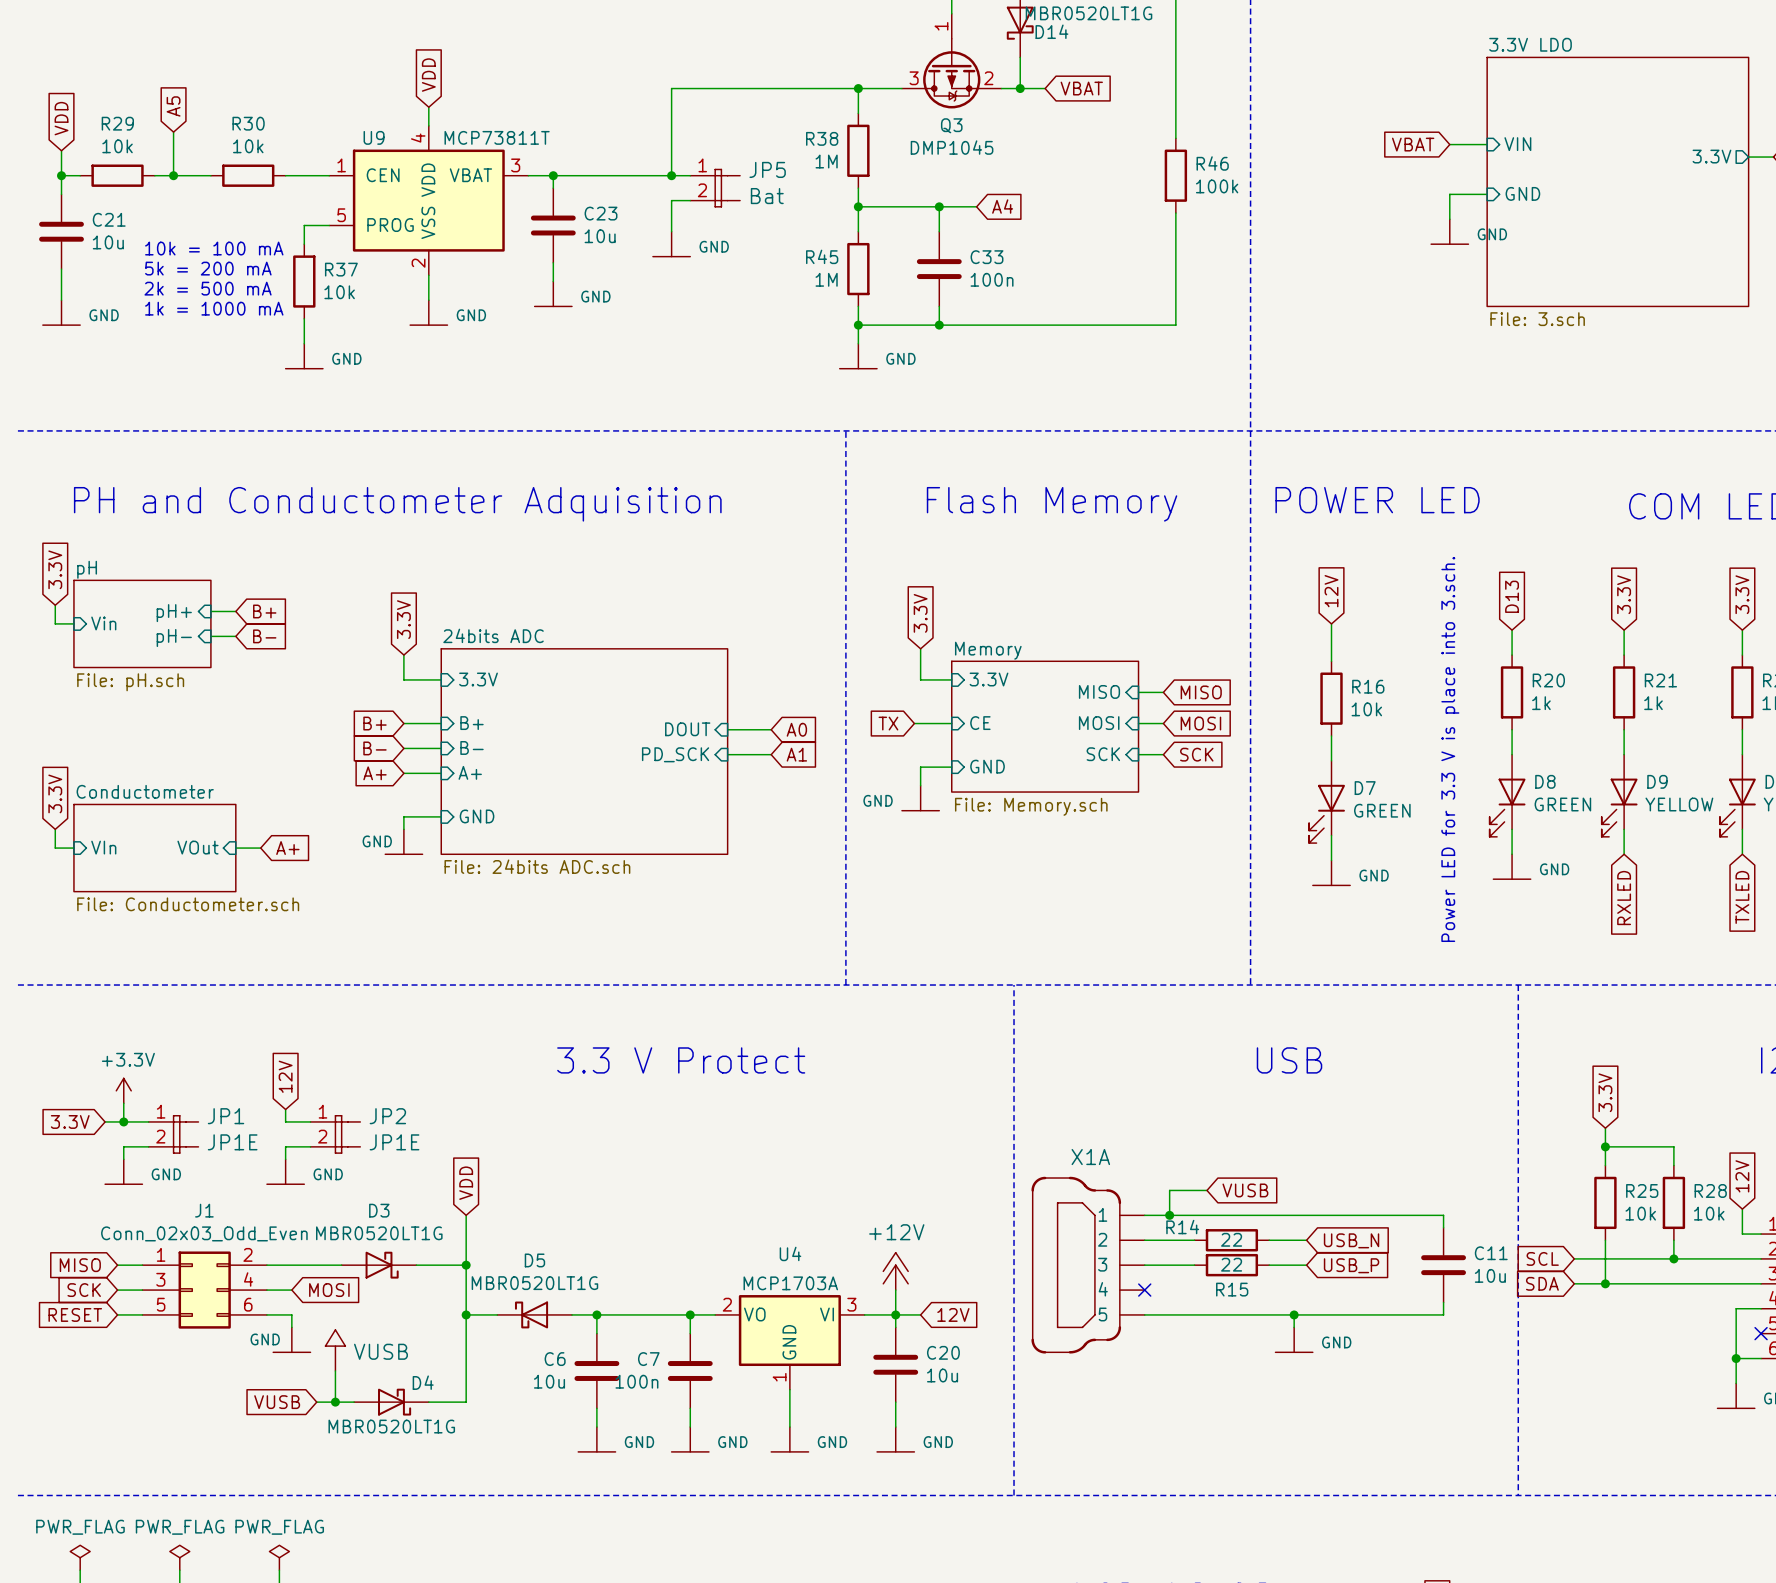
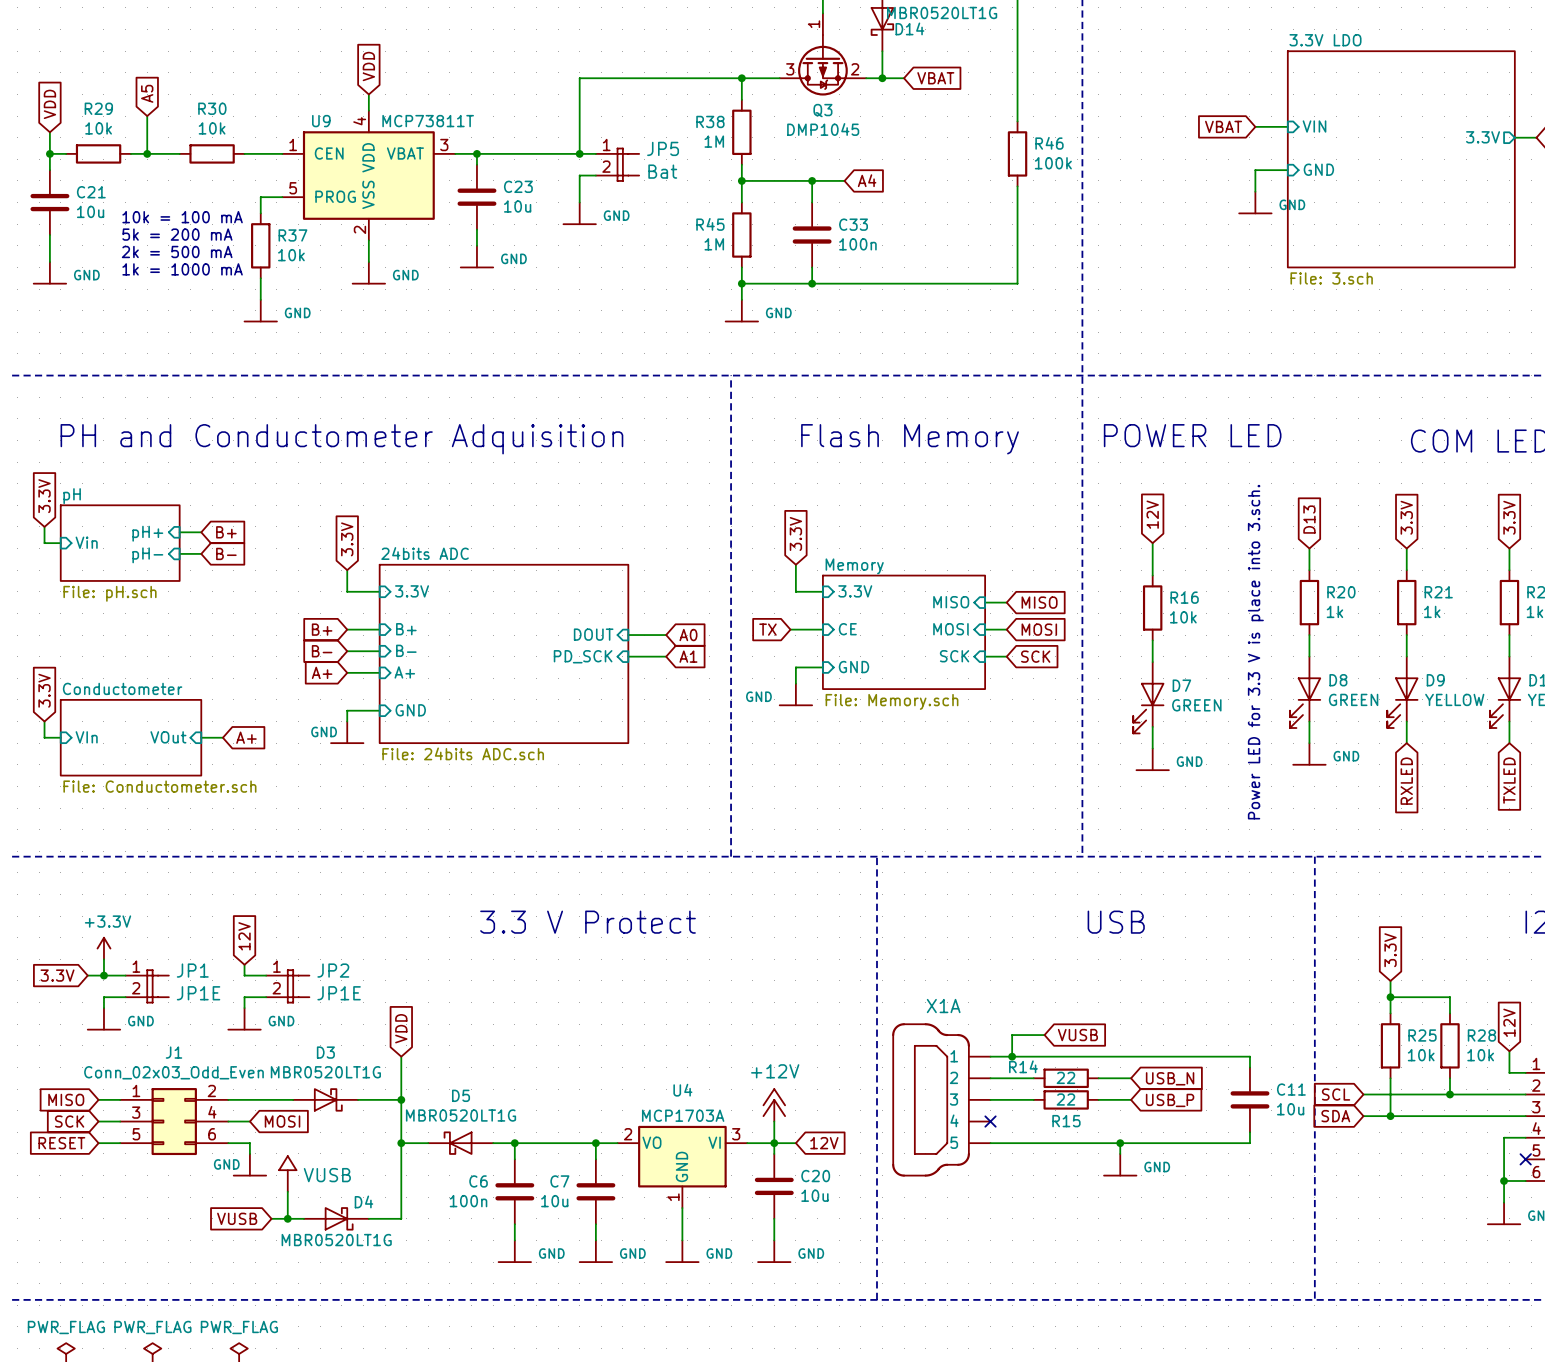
C6 value: 10u (549, 1381) -> 100n (468, 1201)
C7 value: 100n (636, 1381) -> 10u (554, 1201)

